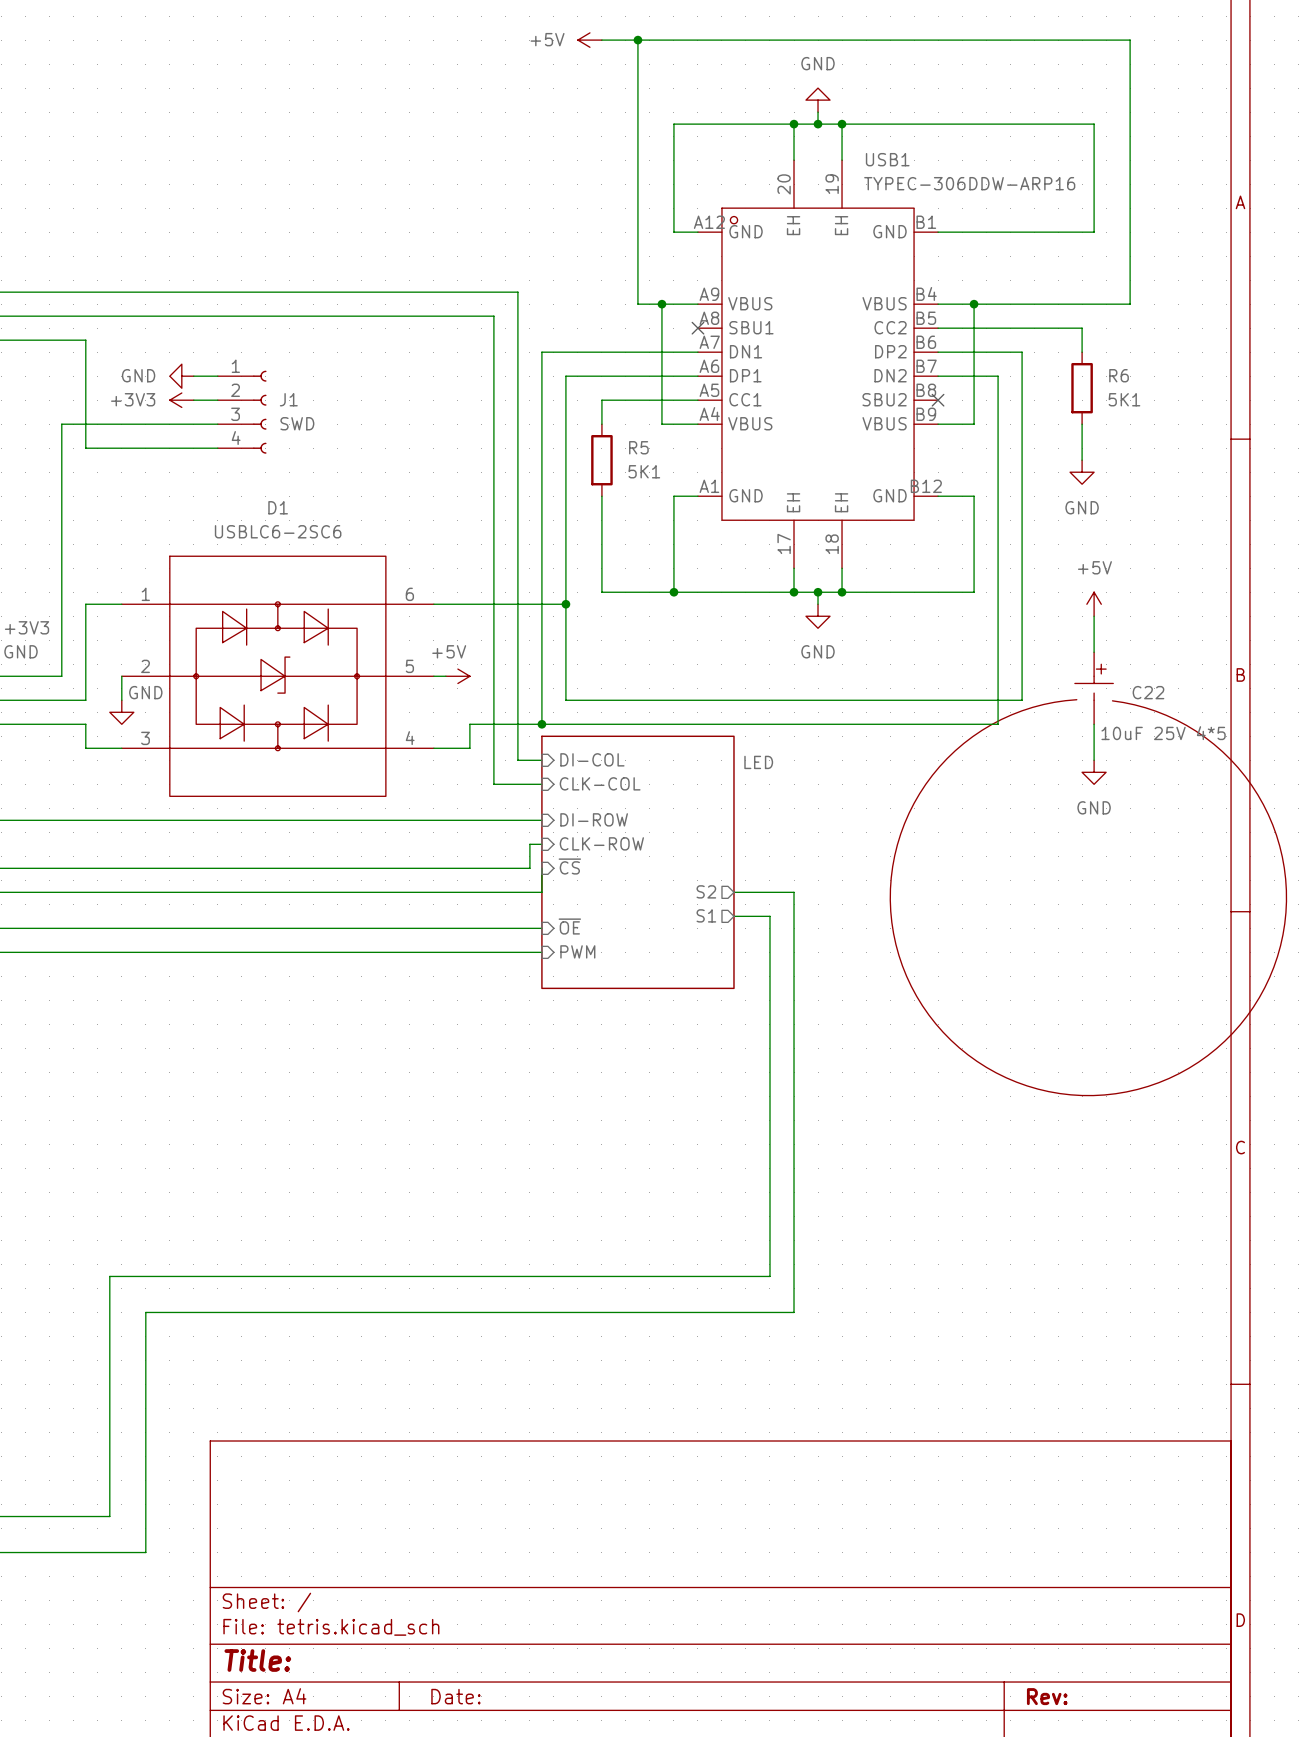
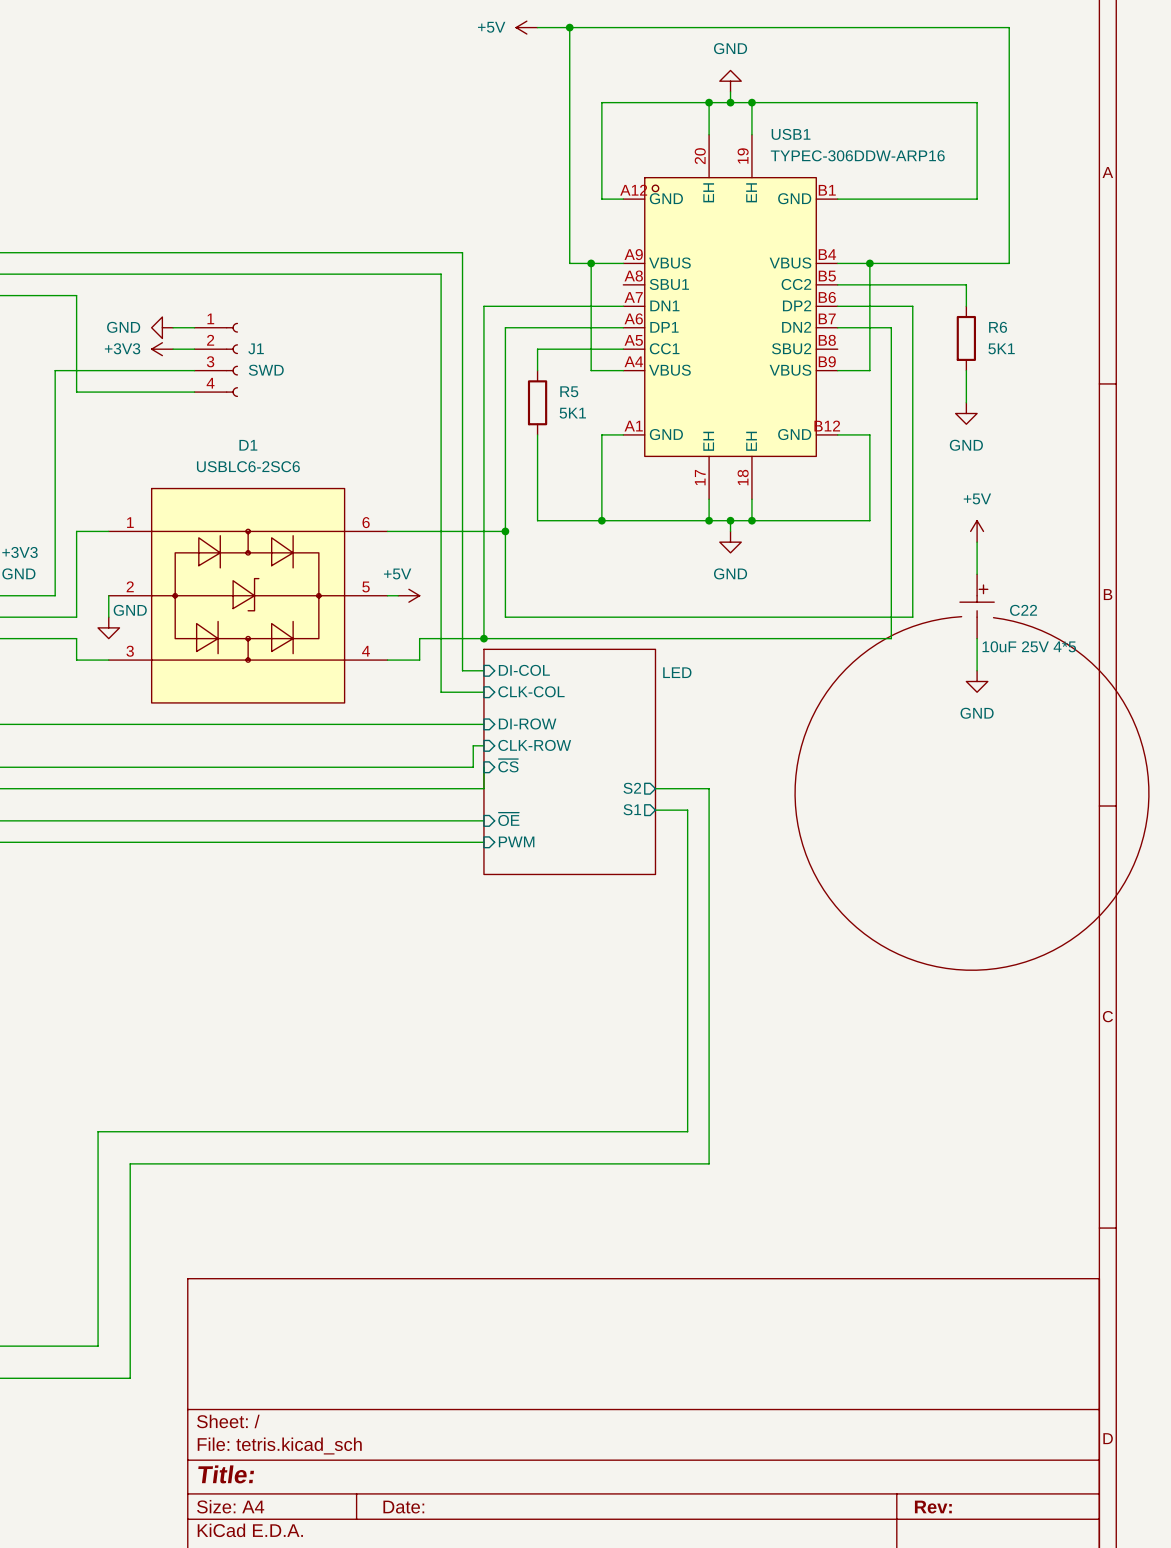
no-connect mark: (697, 328) -> none
no-connect mark: (938, 400) -> none

